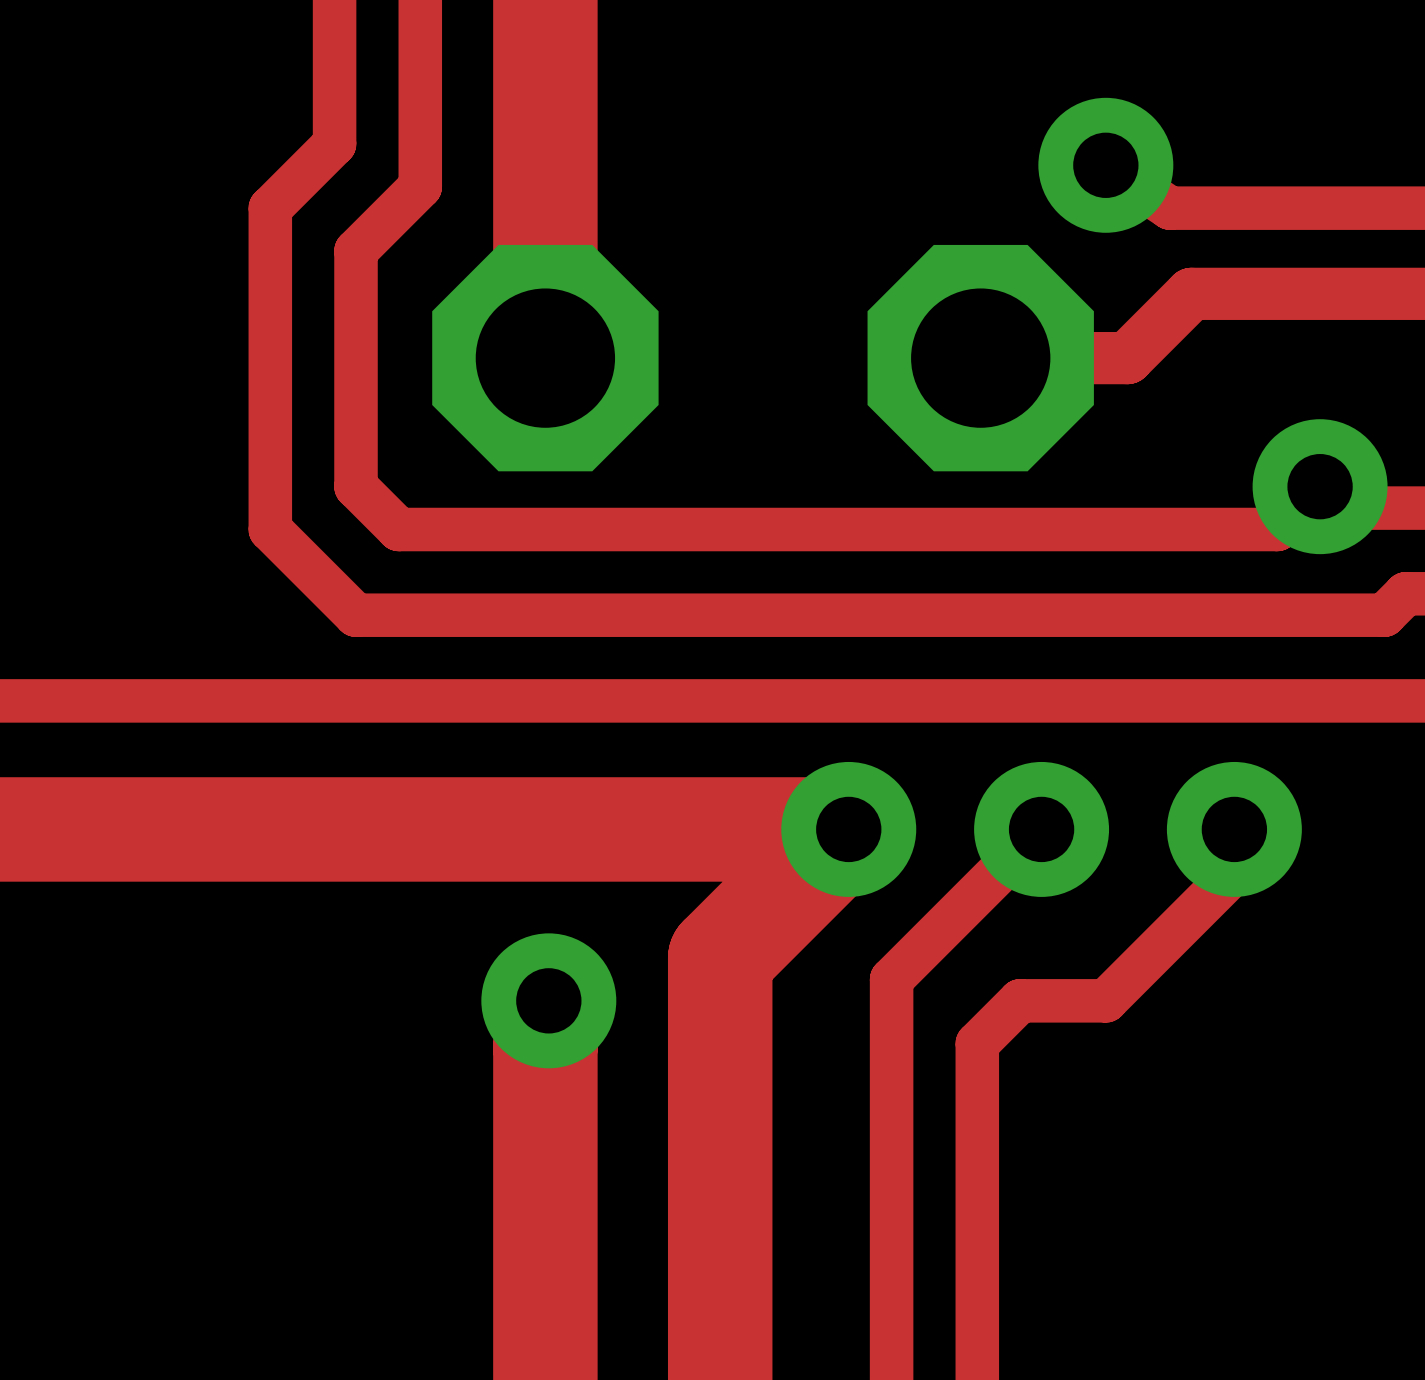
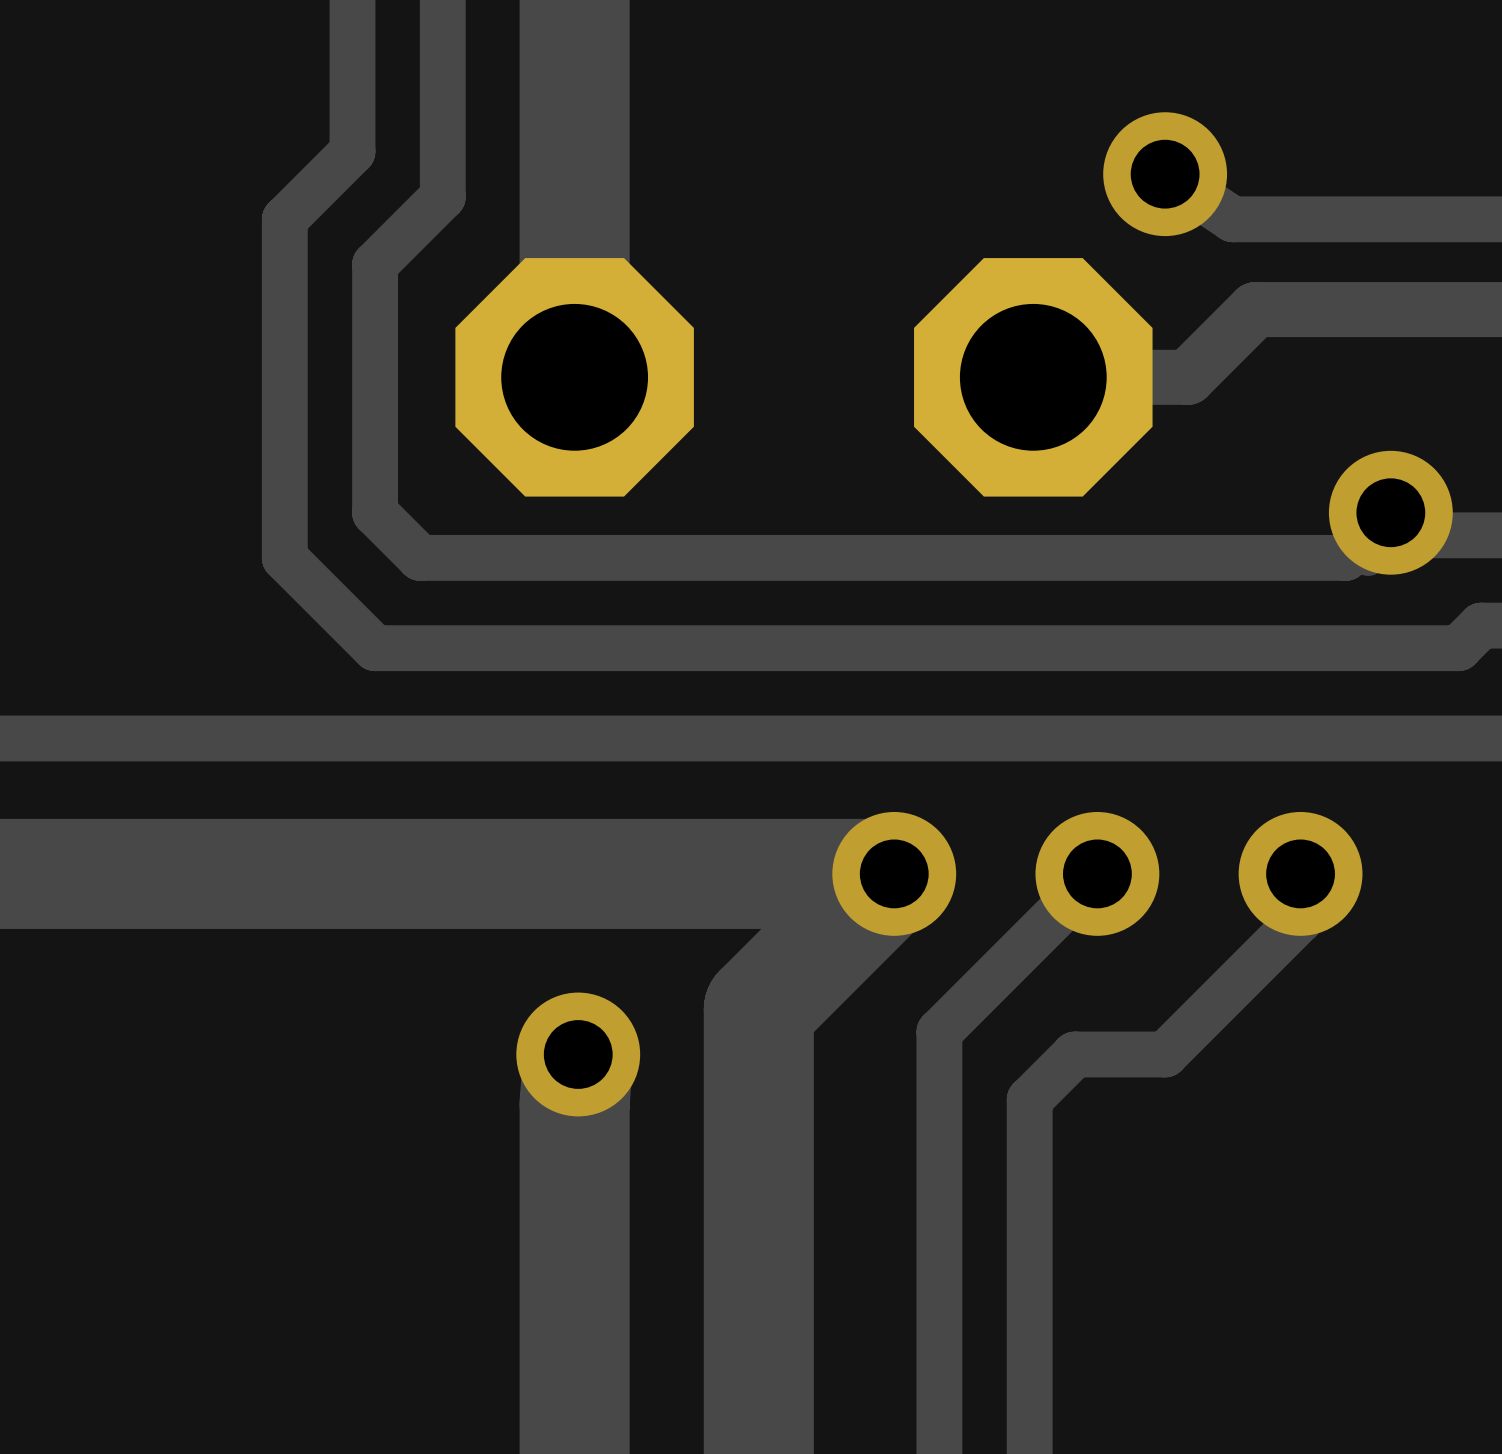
via size: [1038, 97, 1174, 233] -> [1103, 112, 1228, 237]
via size: [1252, 419, 1388, 555] -> [1328, 450, 1453, 575]
via size: [781, 761, 917, 897] -> [832, 811, 957, 936]
via size: [974, 761, 1110, 897] -> [1035, 811, 1160, 936]
via size: [1166, 761, 1302, 897] -> [1238, 811, 1363, 936]
via size: [481, 933, 617, 1069] -> [516, 992, 641, 1117]

